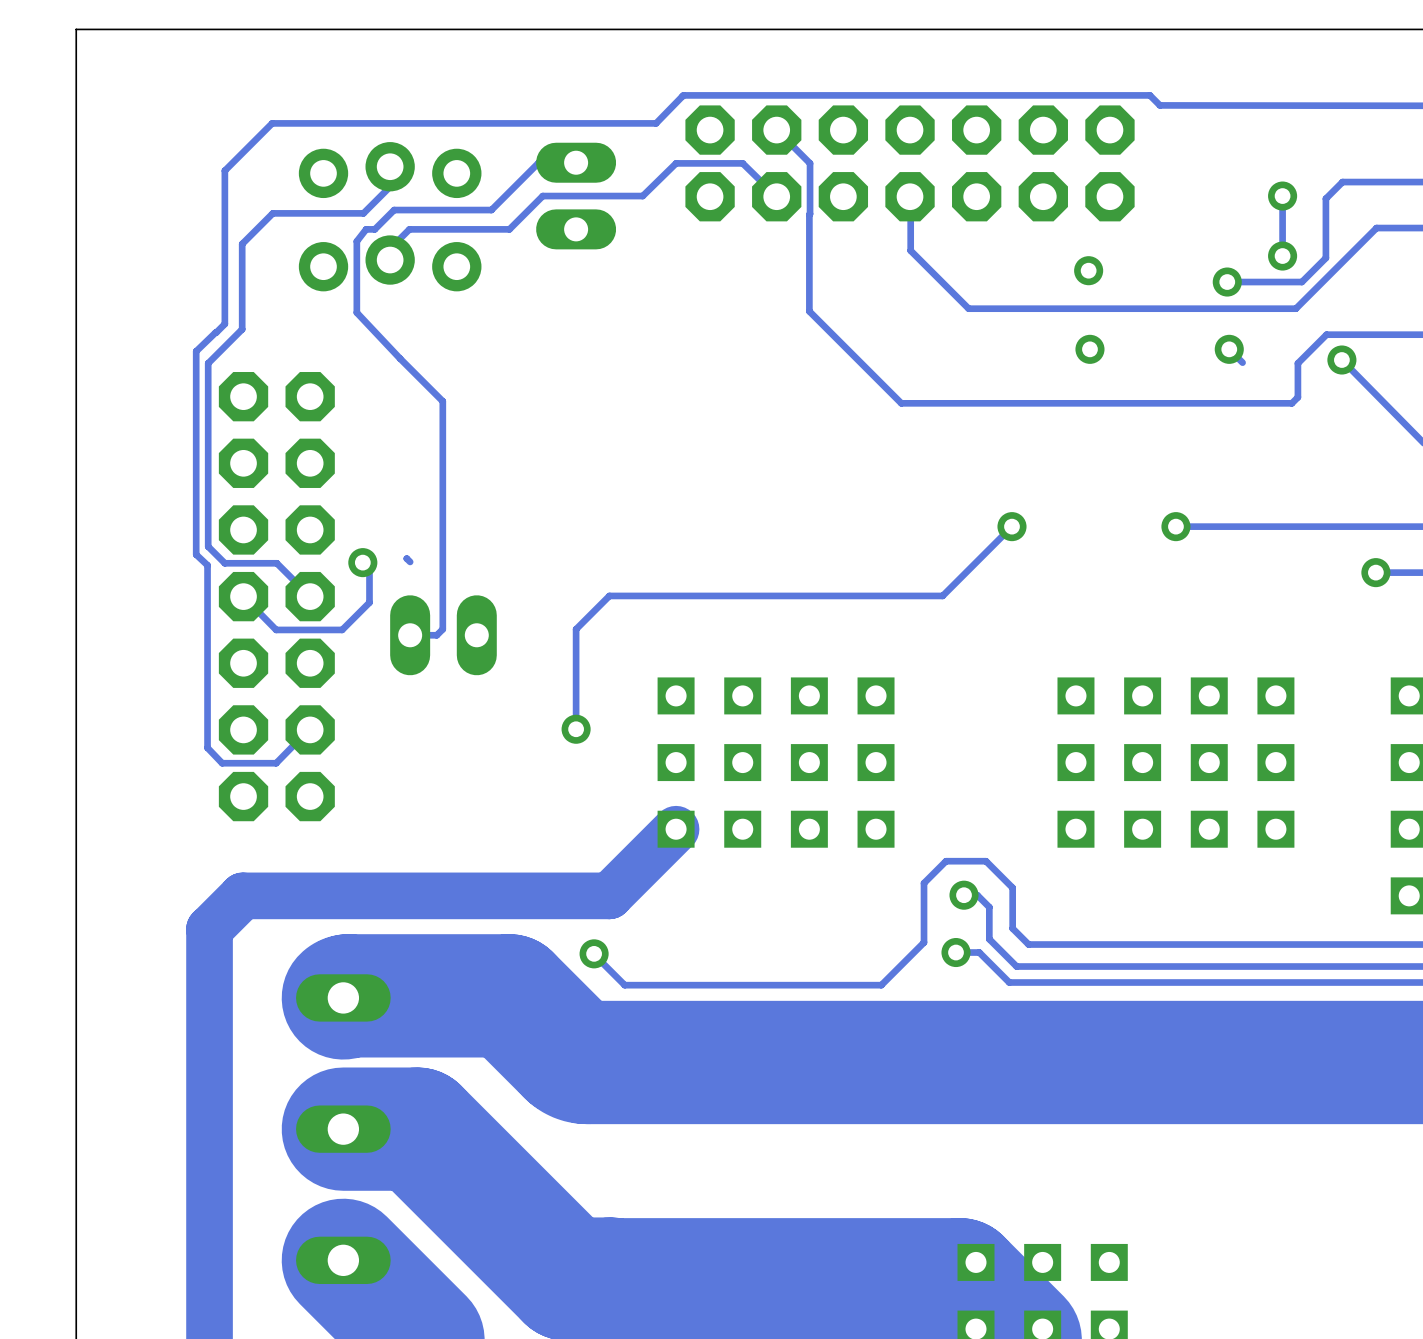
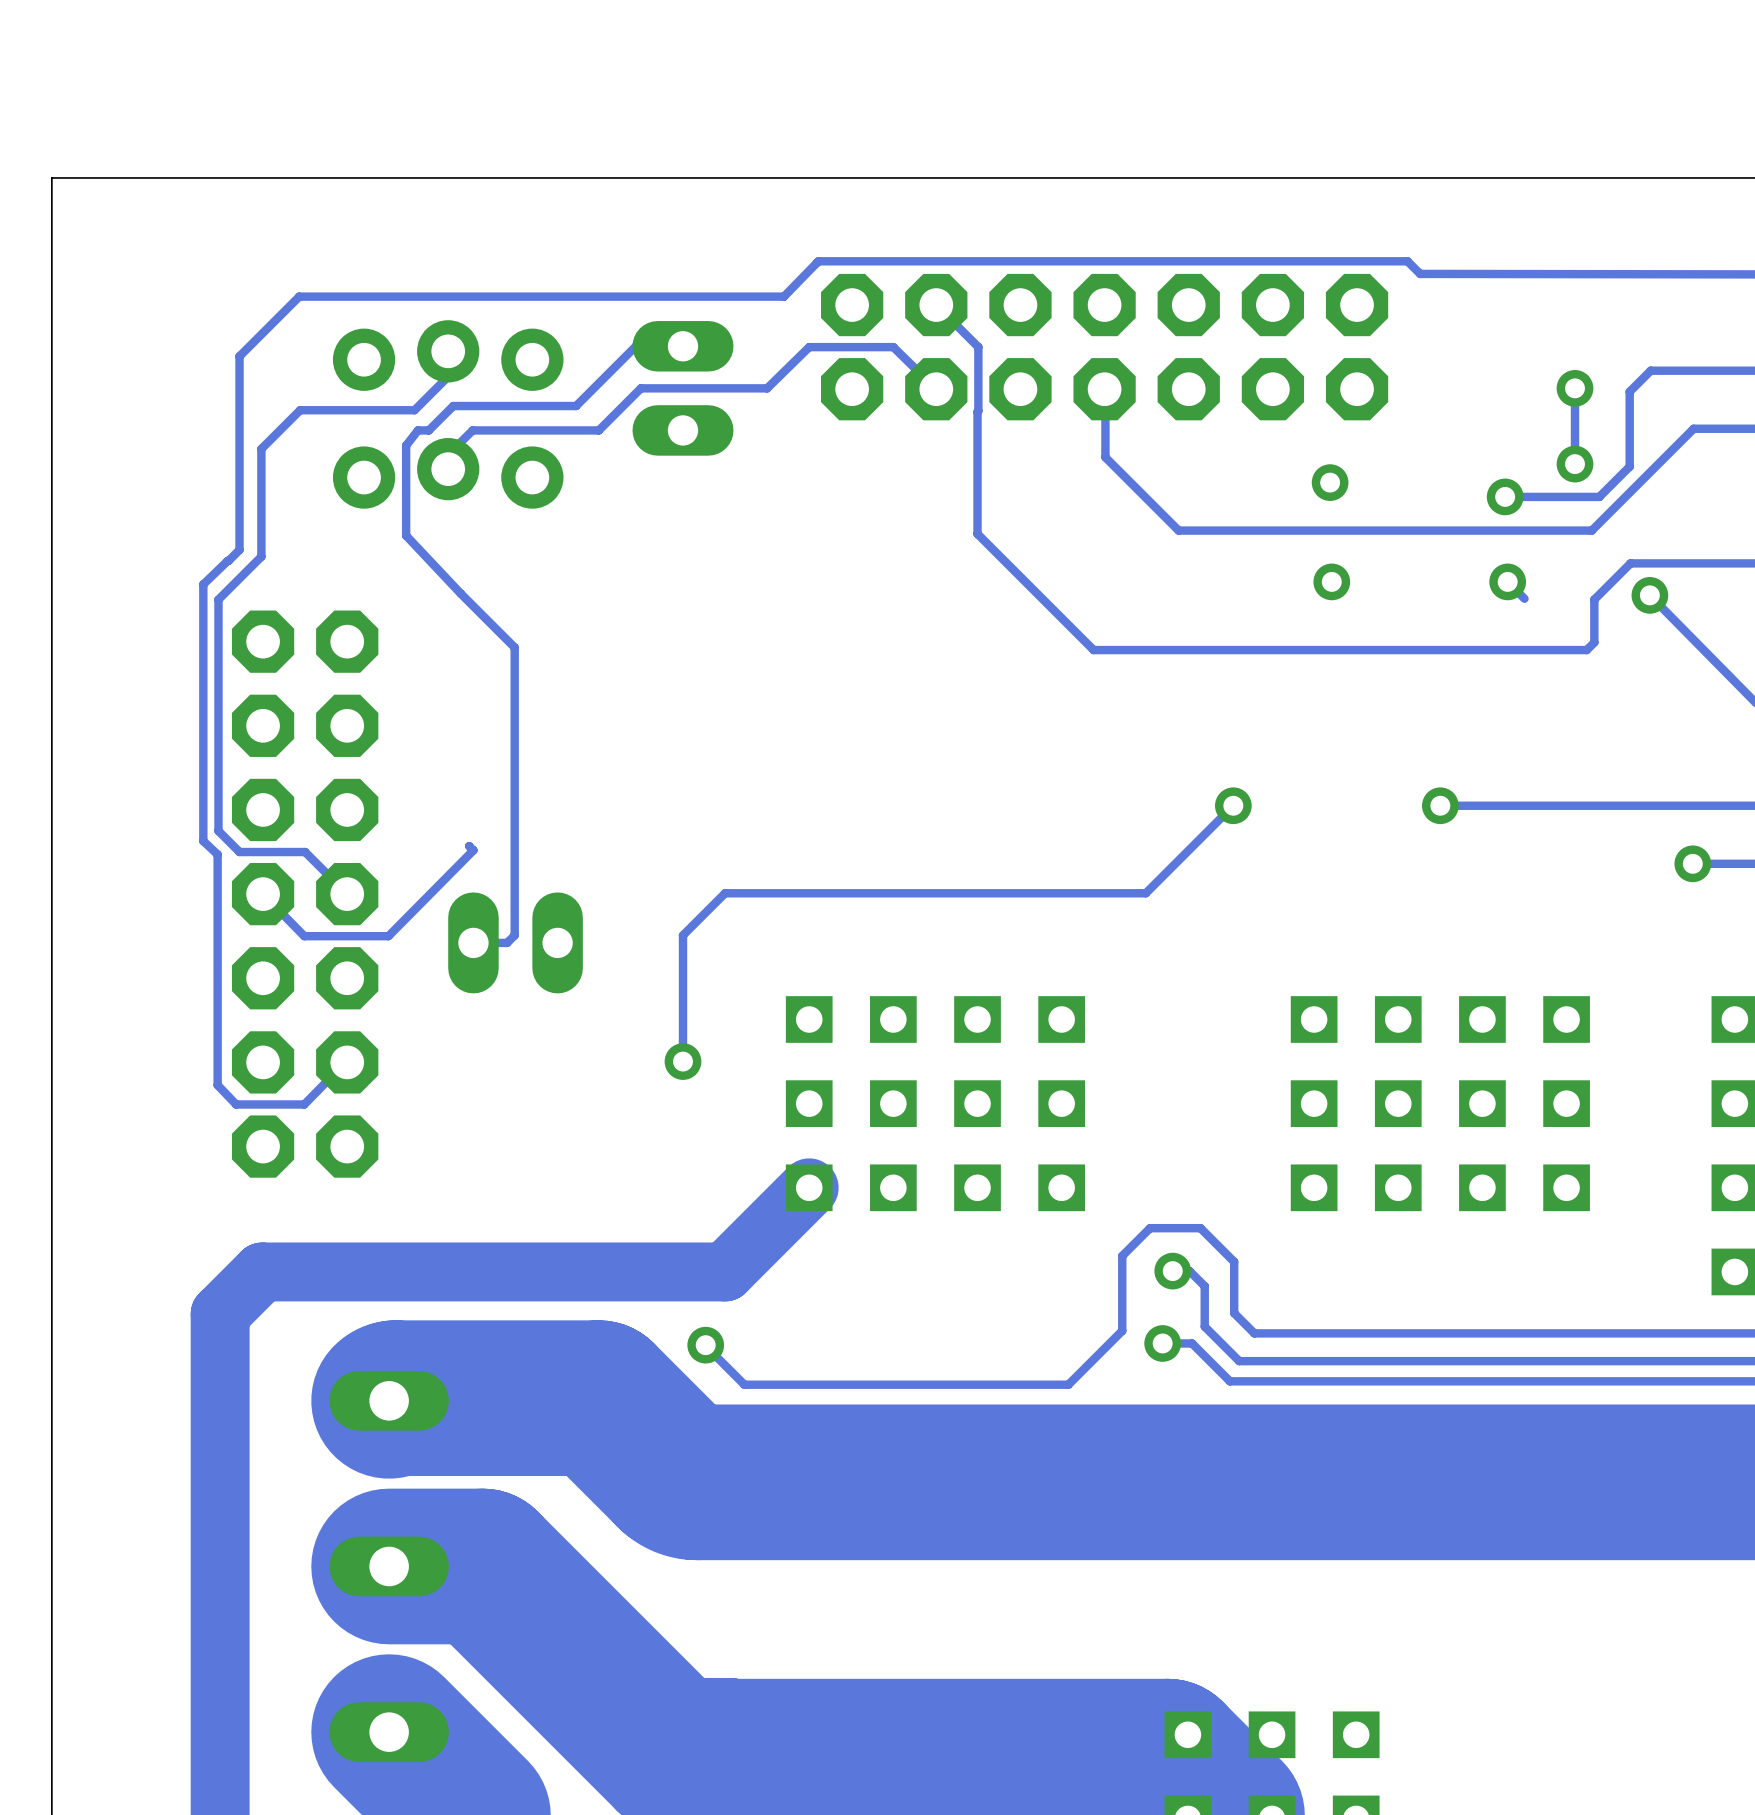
track: (362, 562) (369, 569) (369, 602) (342, 629) -> (473, 850) (387, 936)
via: (362, 562) -> none

